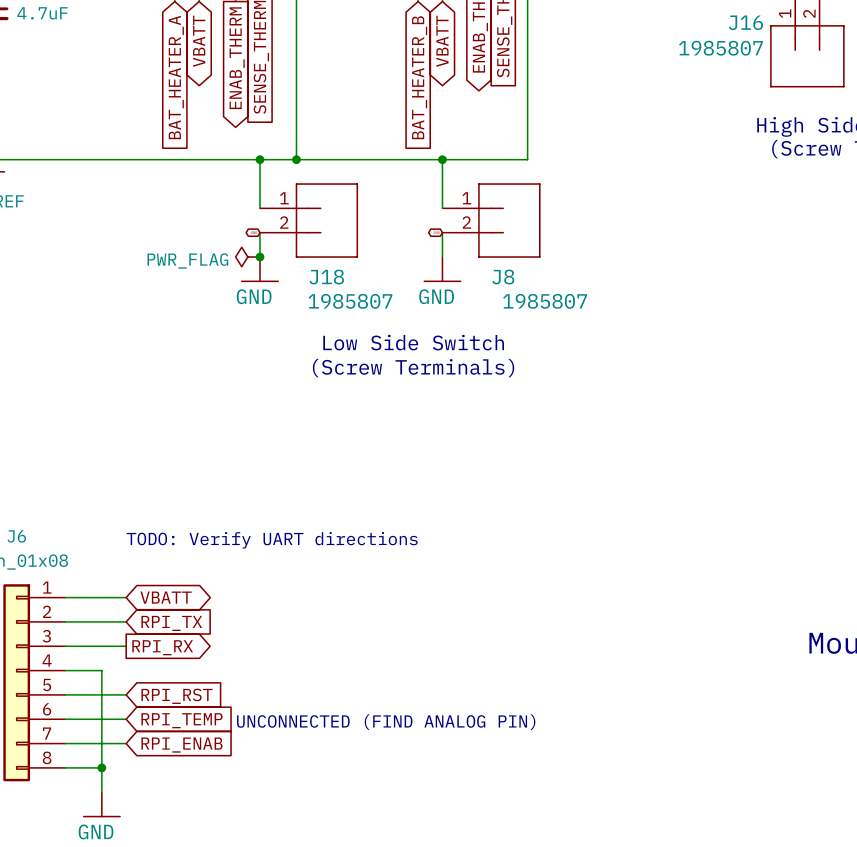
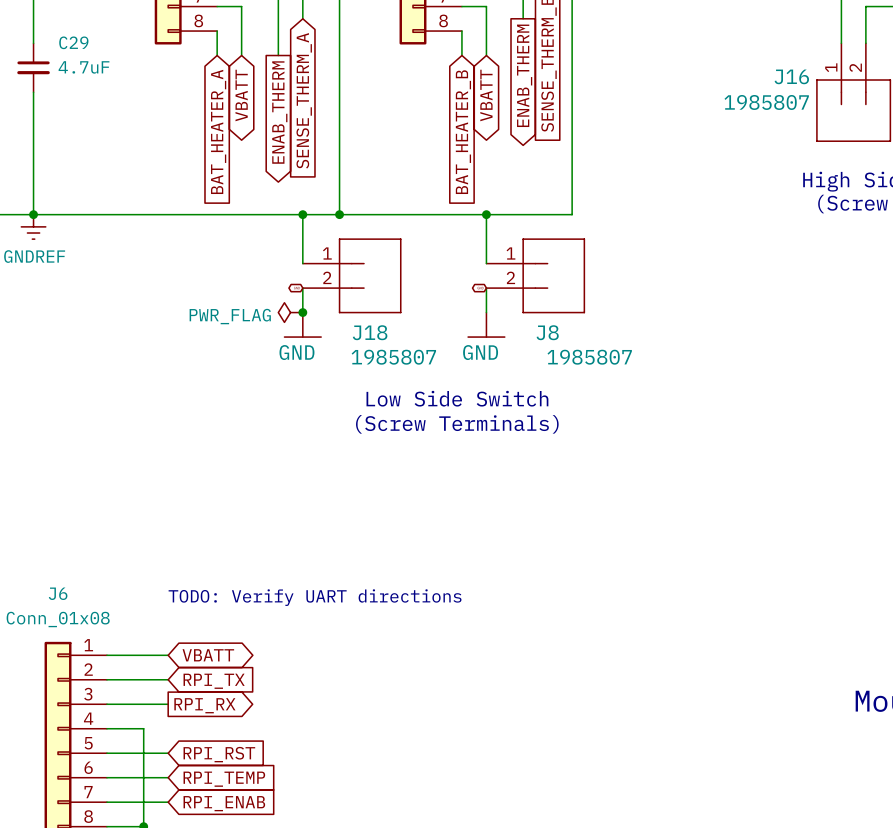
text: UNCONNECTED (FIND ANALOG PIN) (386, 722) -> none

